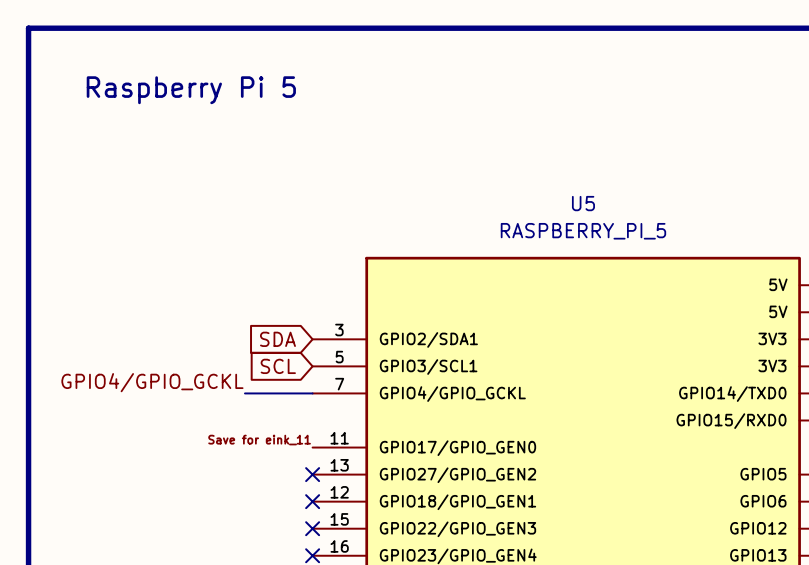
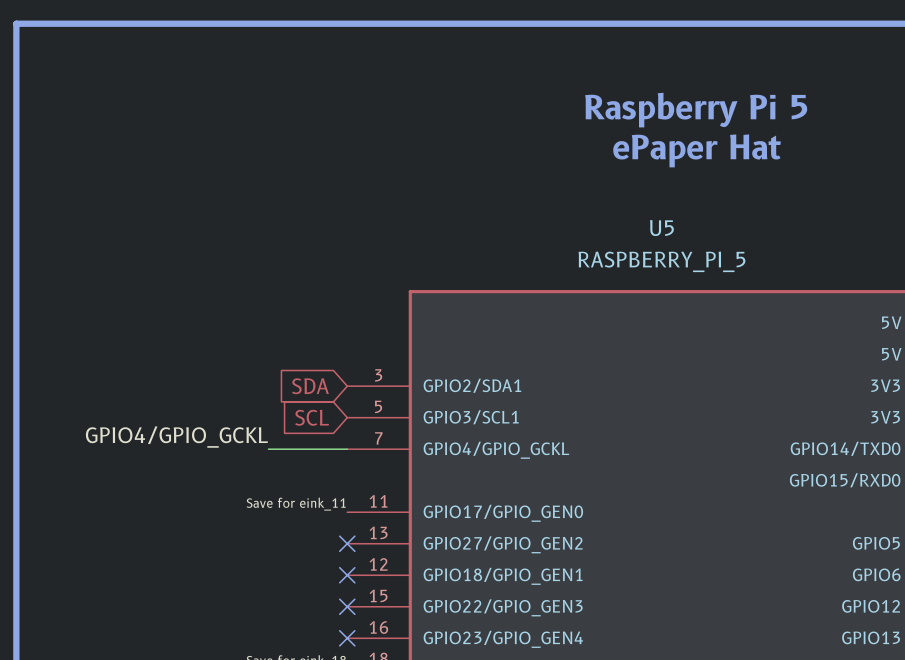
text: Raspberry Pi 5 (191, 90) -> none
text: none -> Raspberry Pi 5 (696, 110)
text: none -> ePaper Hat (697, 150)

